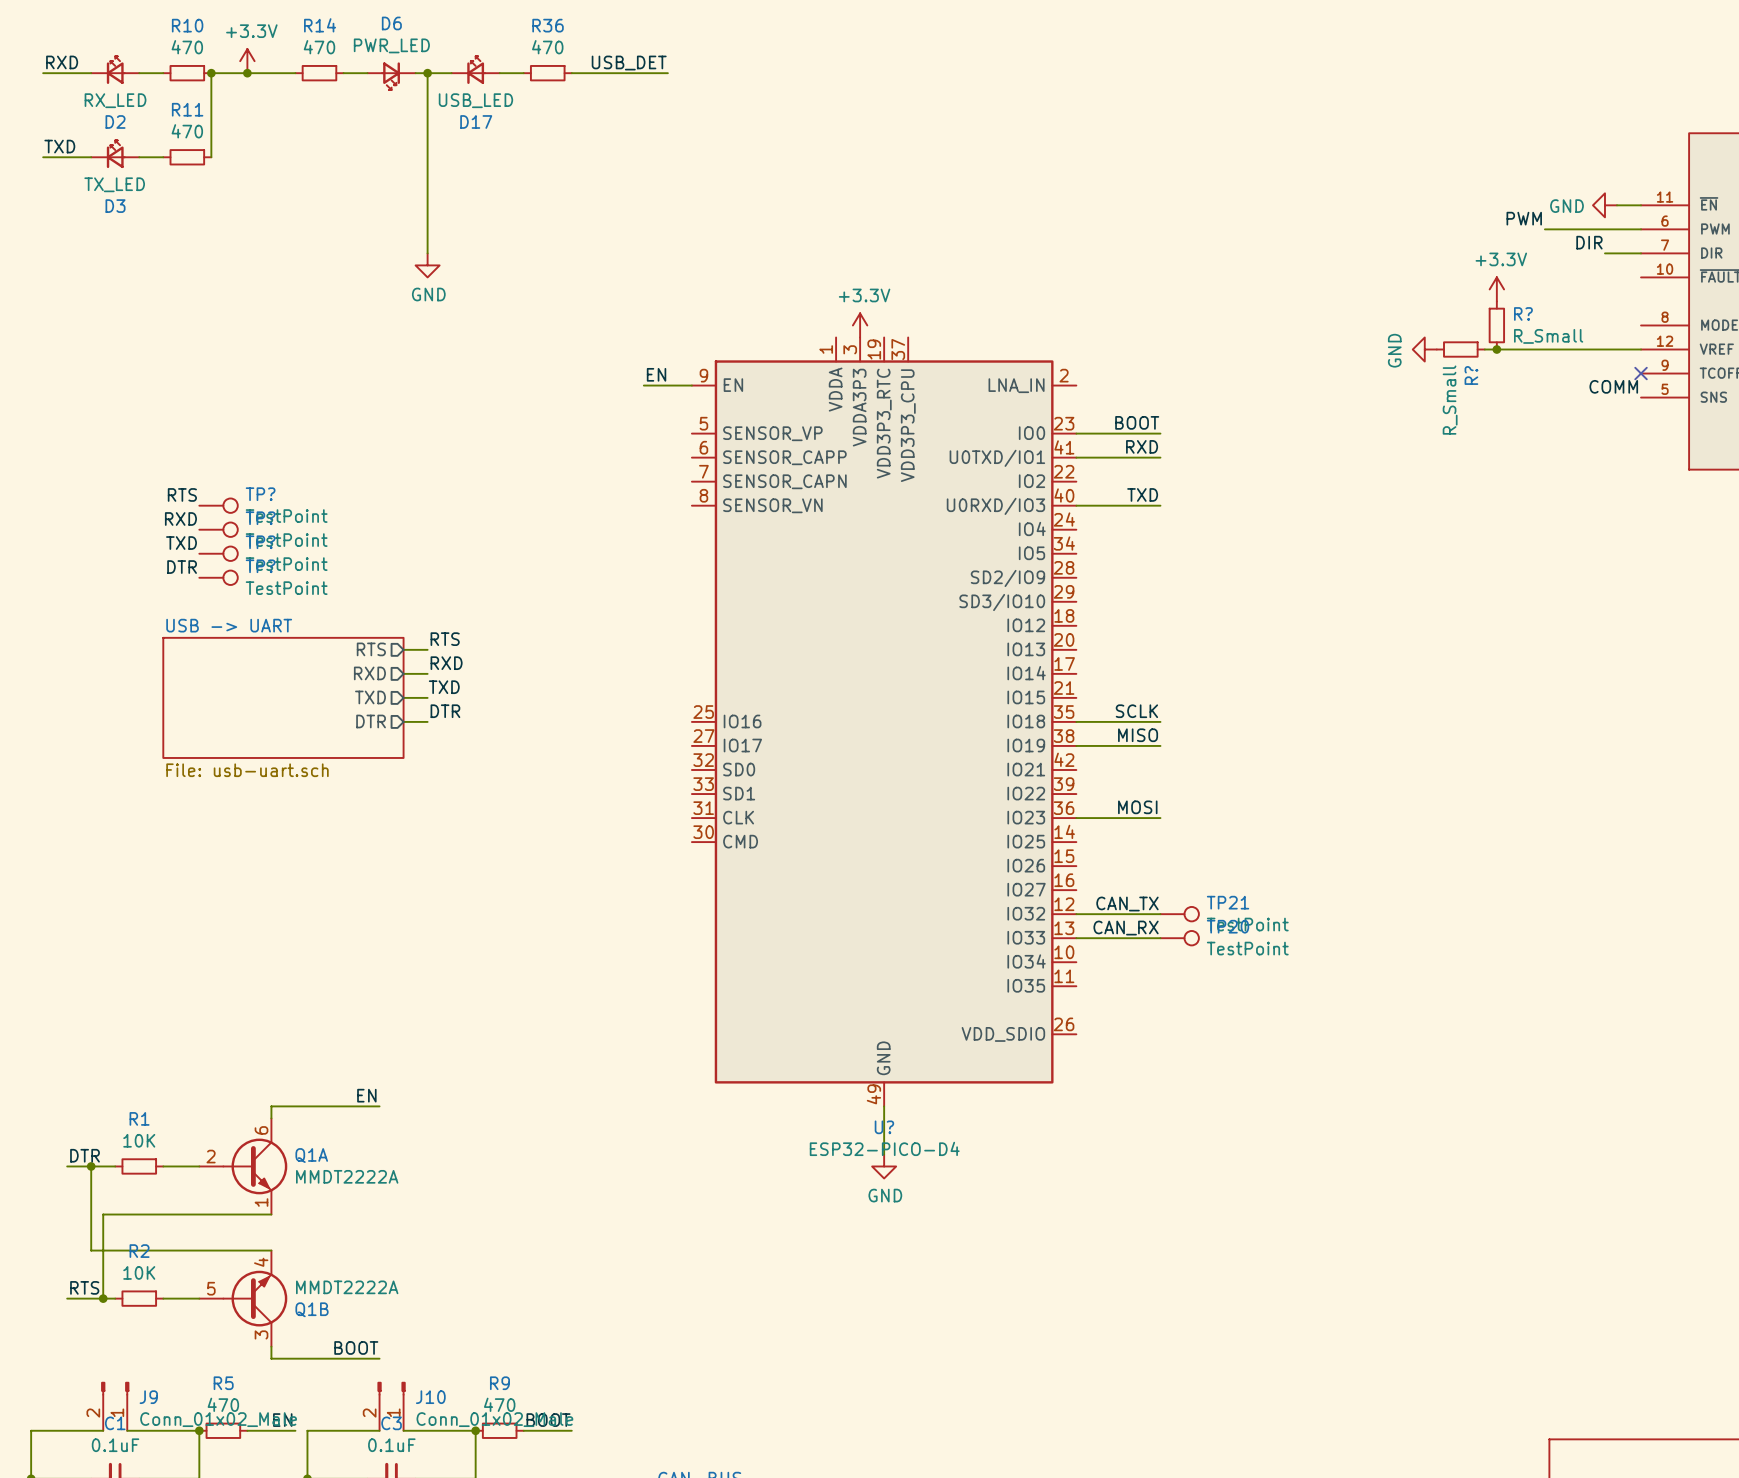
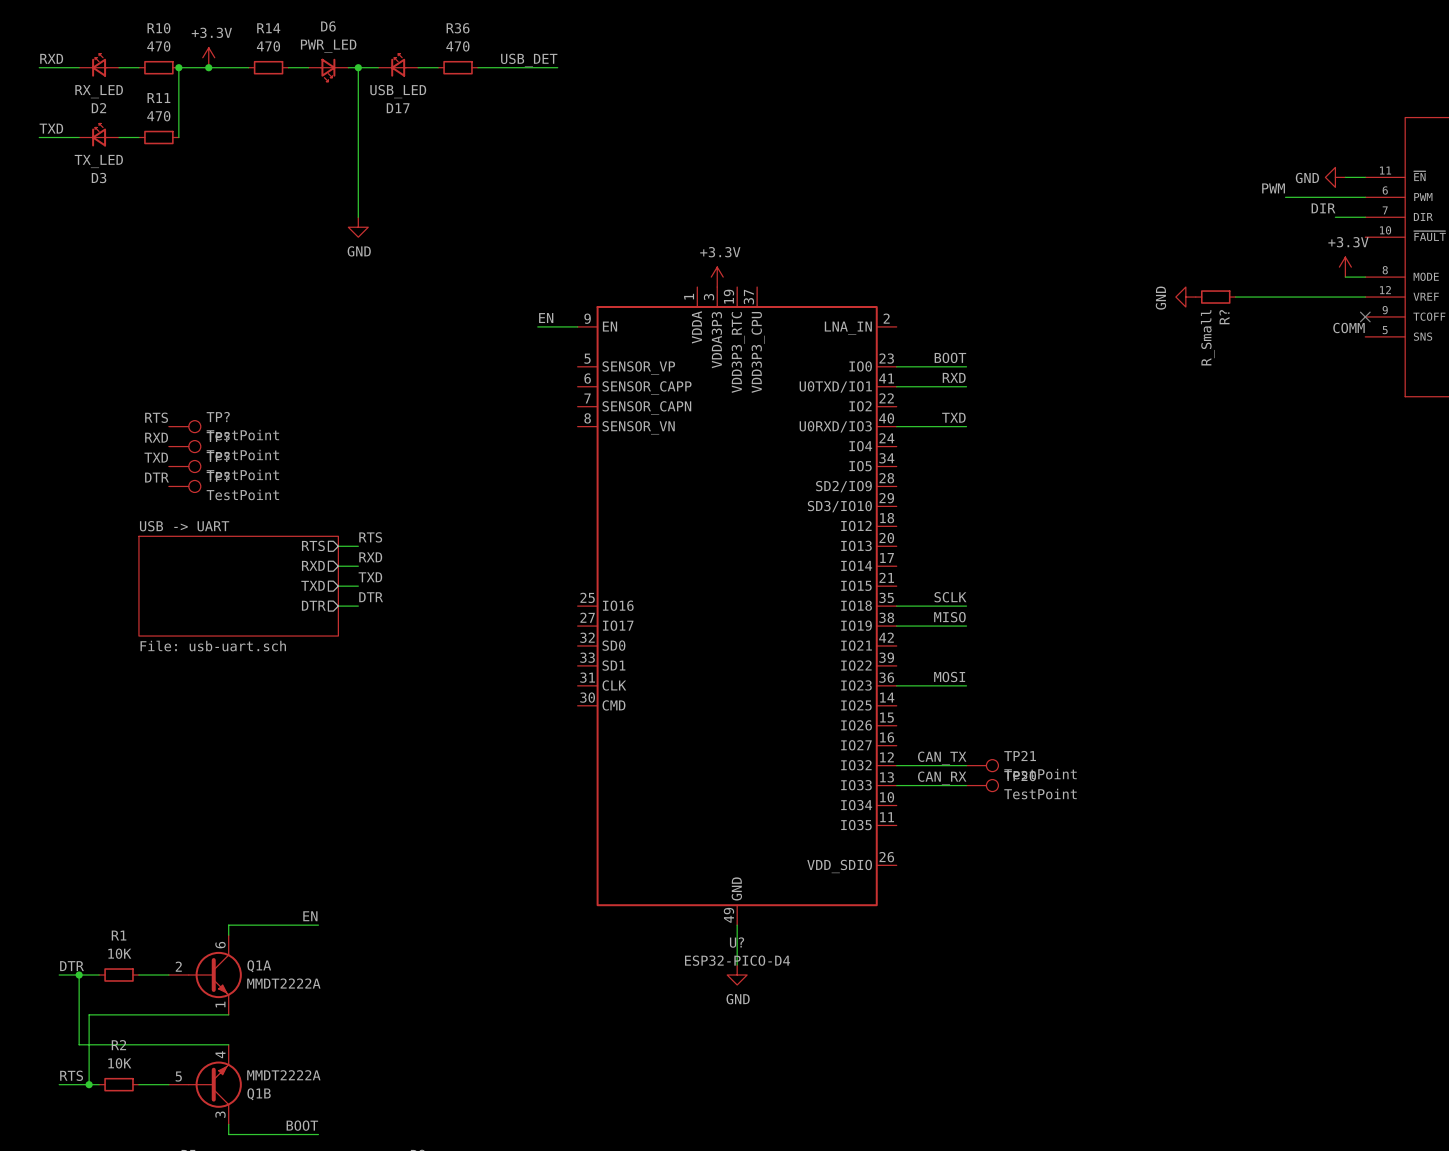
power symbol position: +3.3V (1496, 289) -> +3.3V (1345, 267)
R?: R_Small (1496, 325) -> none
wire: none -> (1345, 277) (1365, 277)
junction: (1496, 349) -> none

